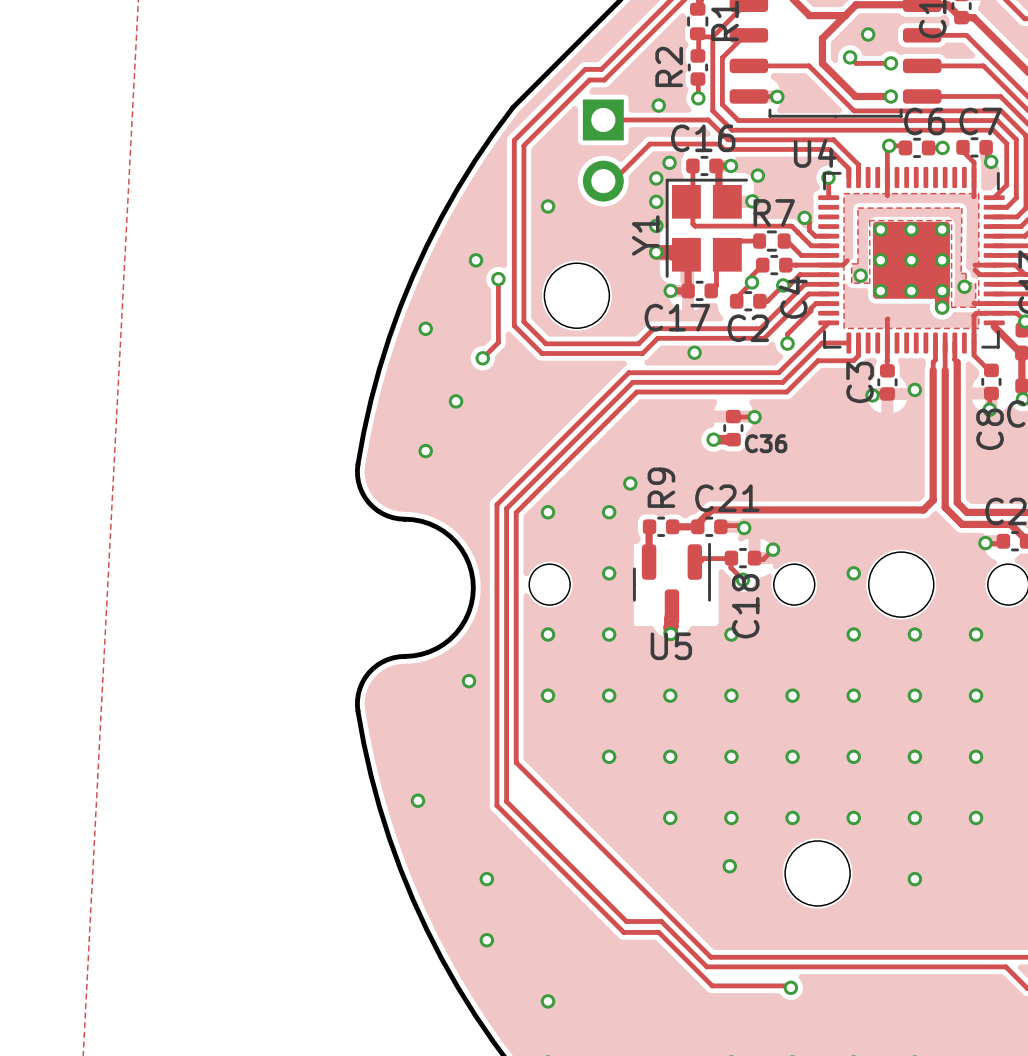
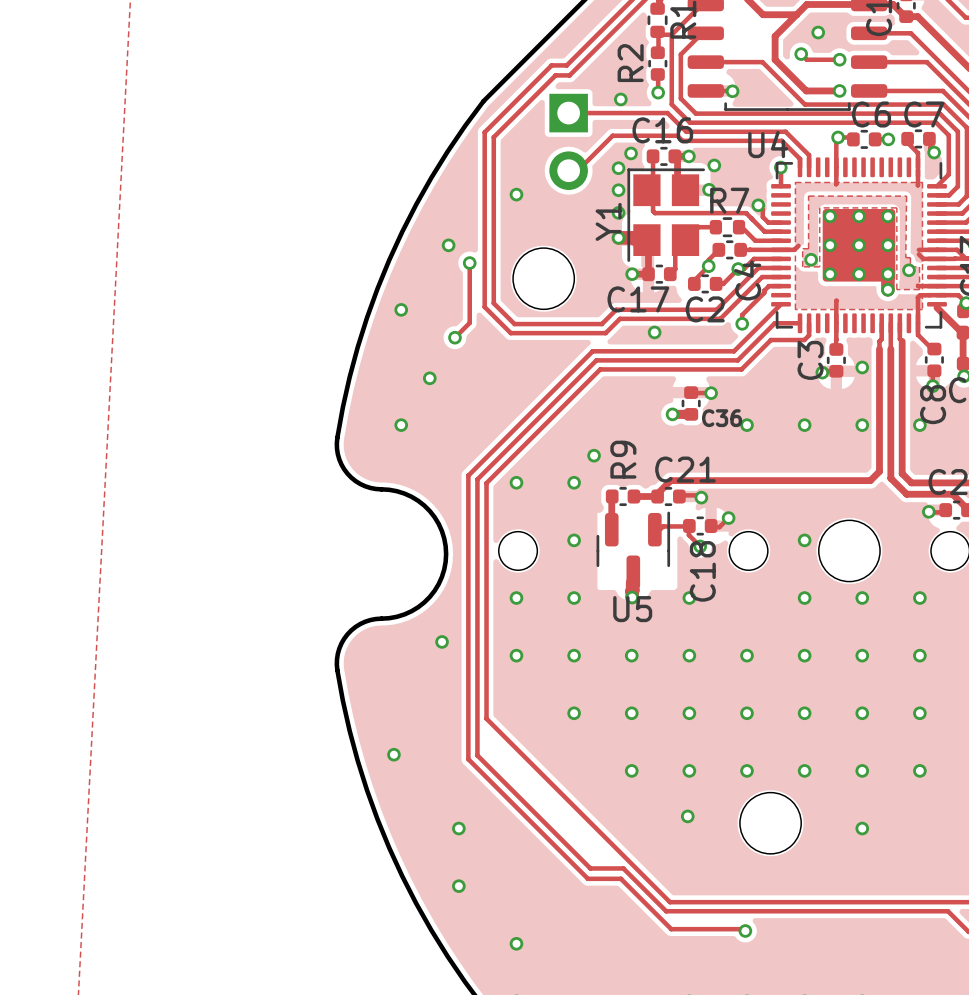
via: none -> (747, 425)
via: none -> (804, 425)
via: none -> (862, 425)
via: none -> (919, 425)

